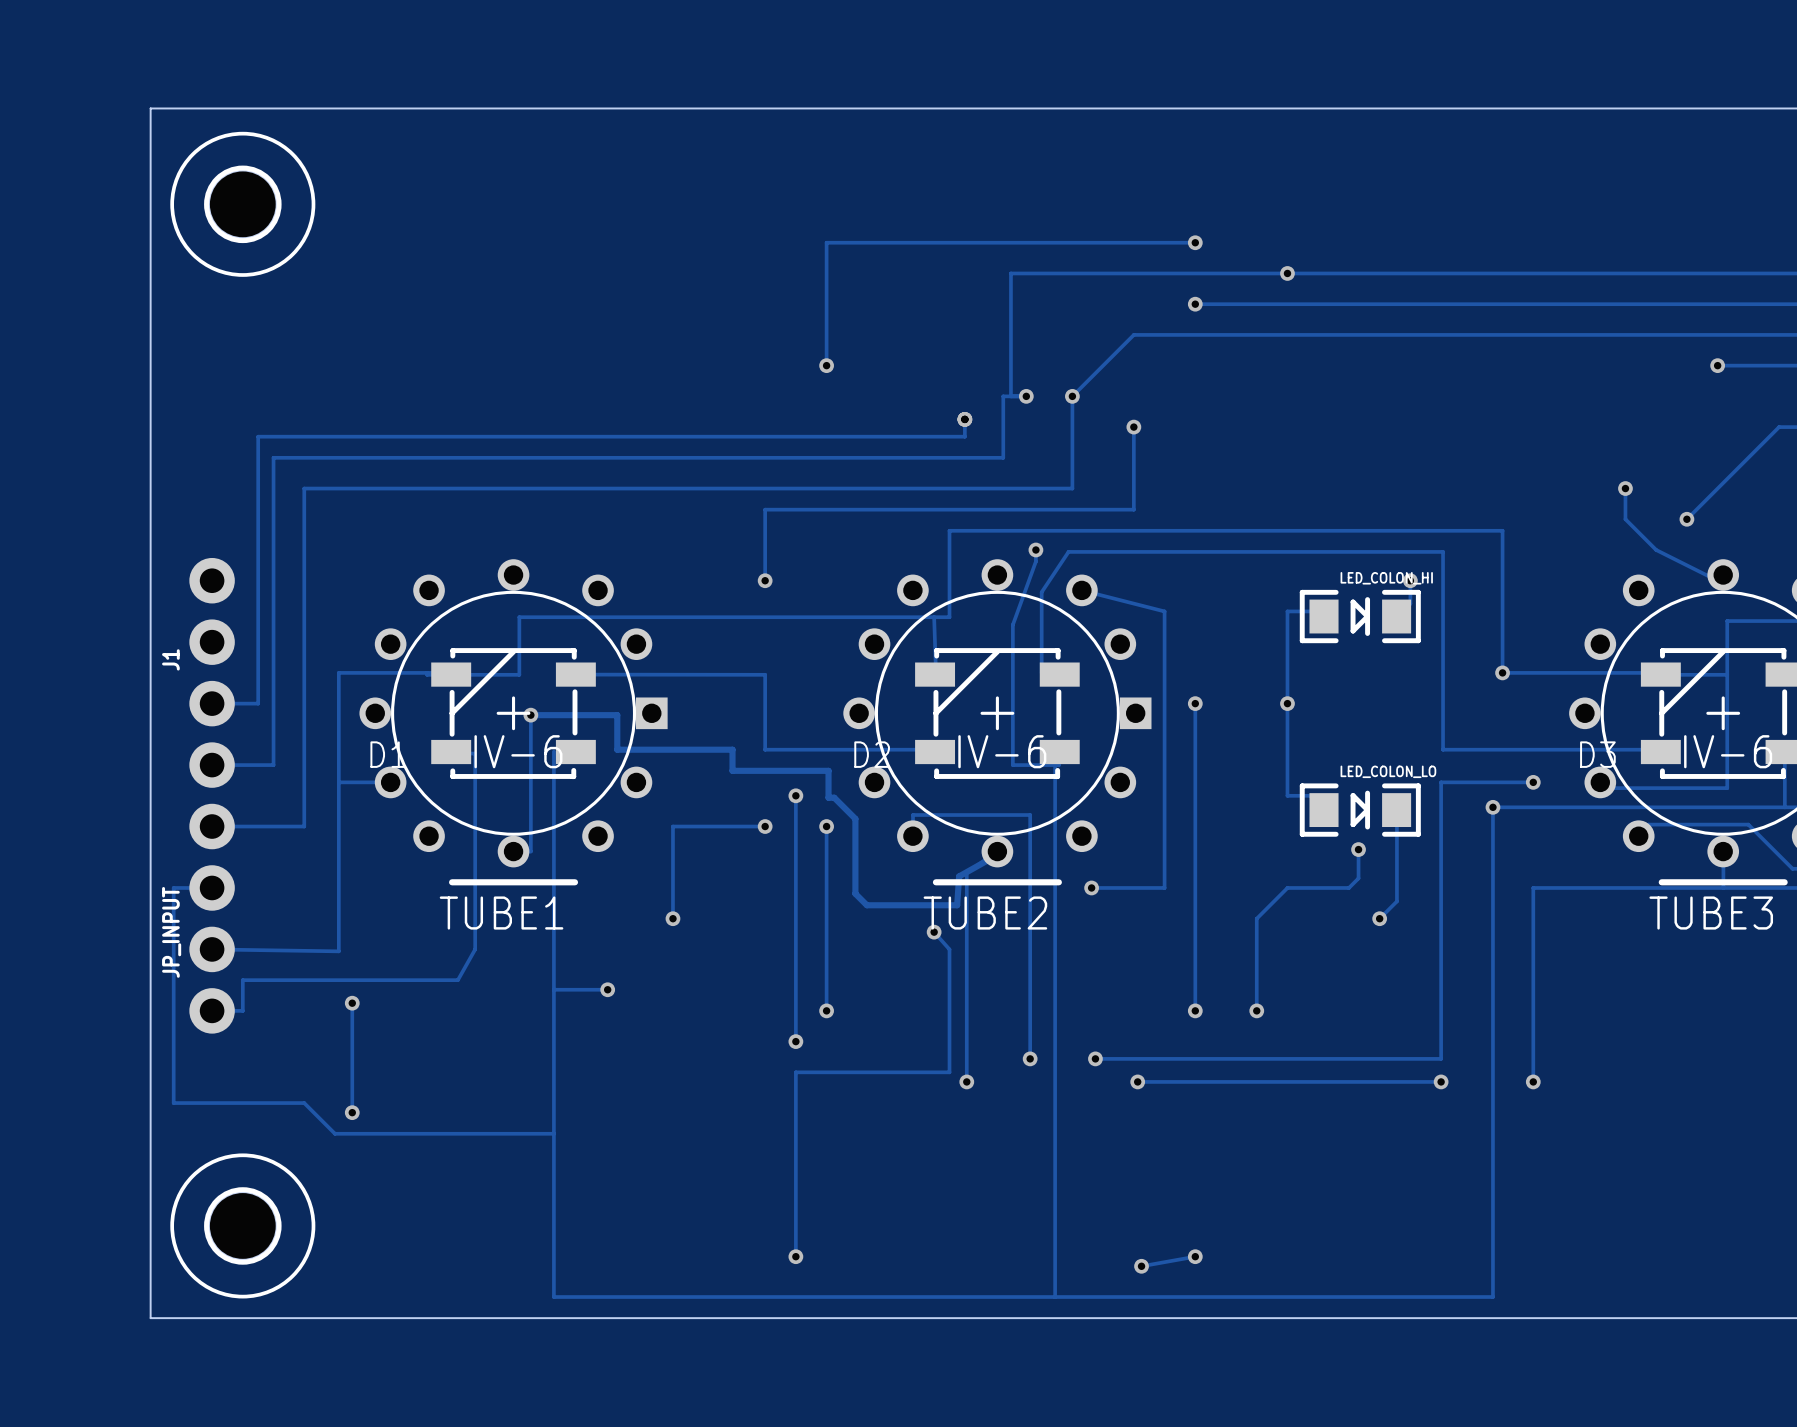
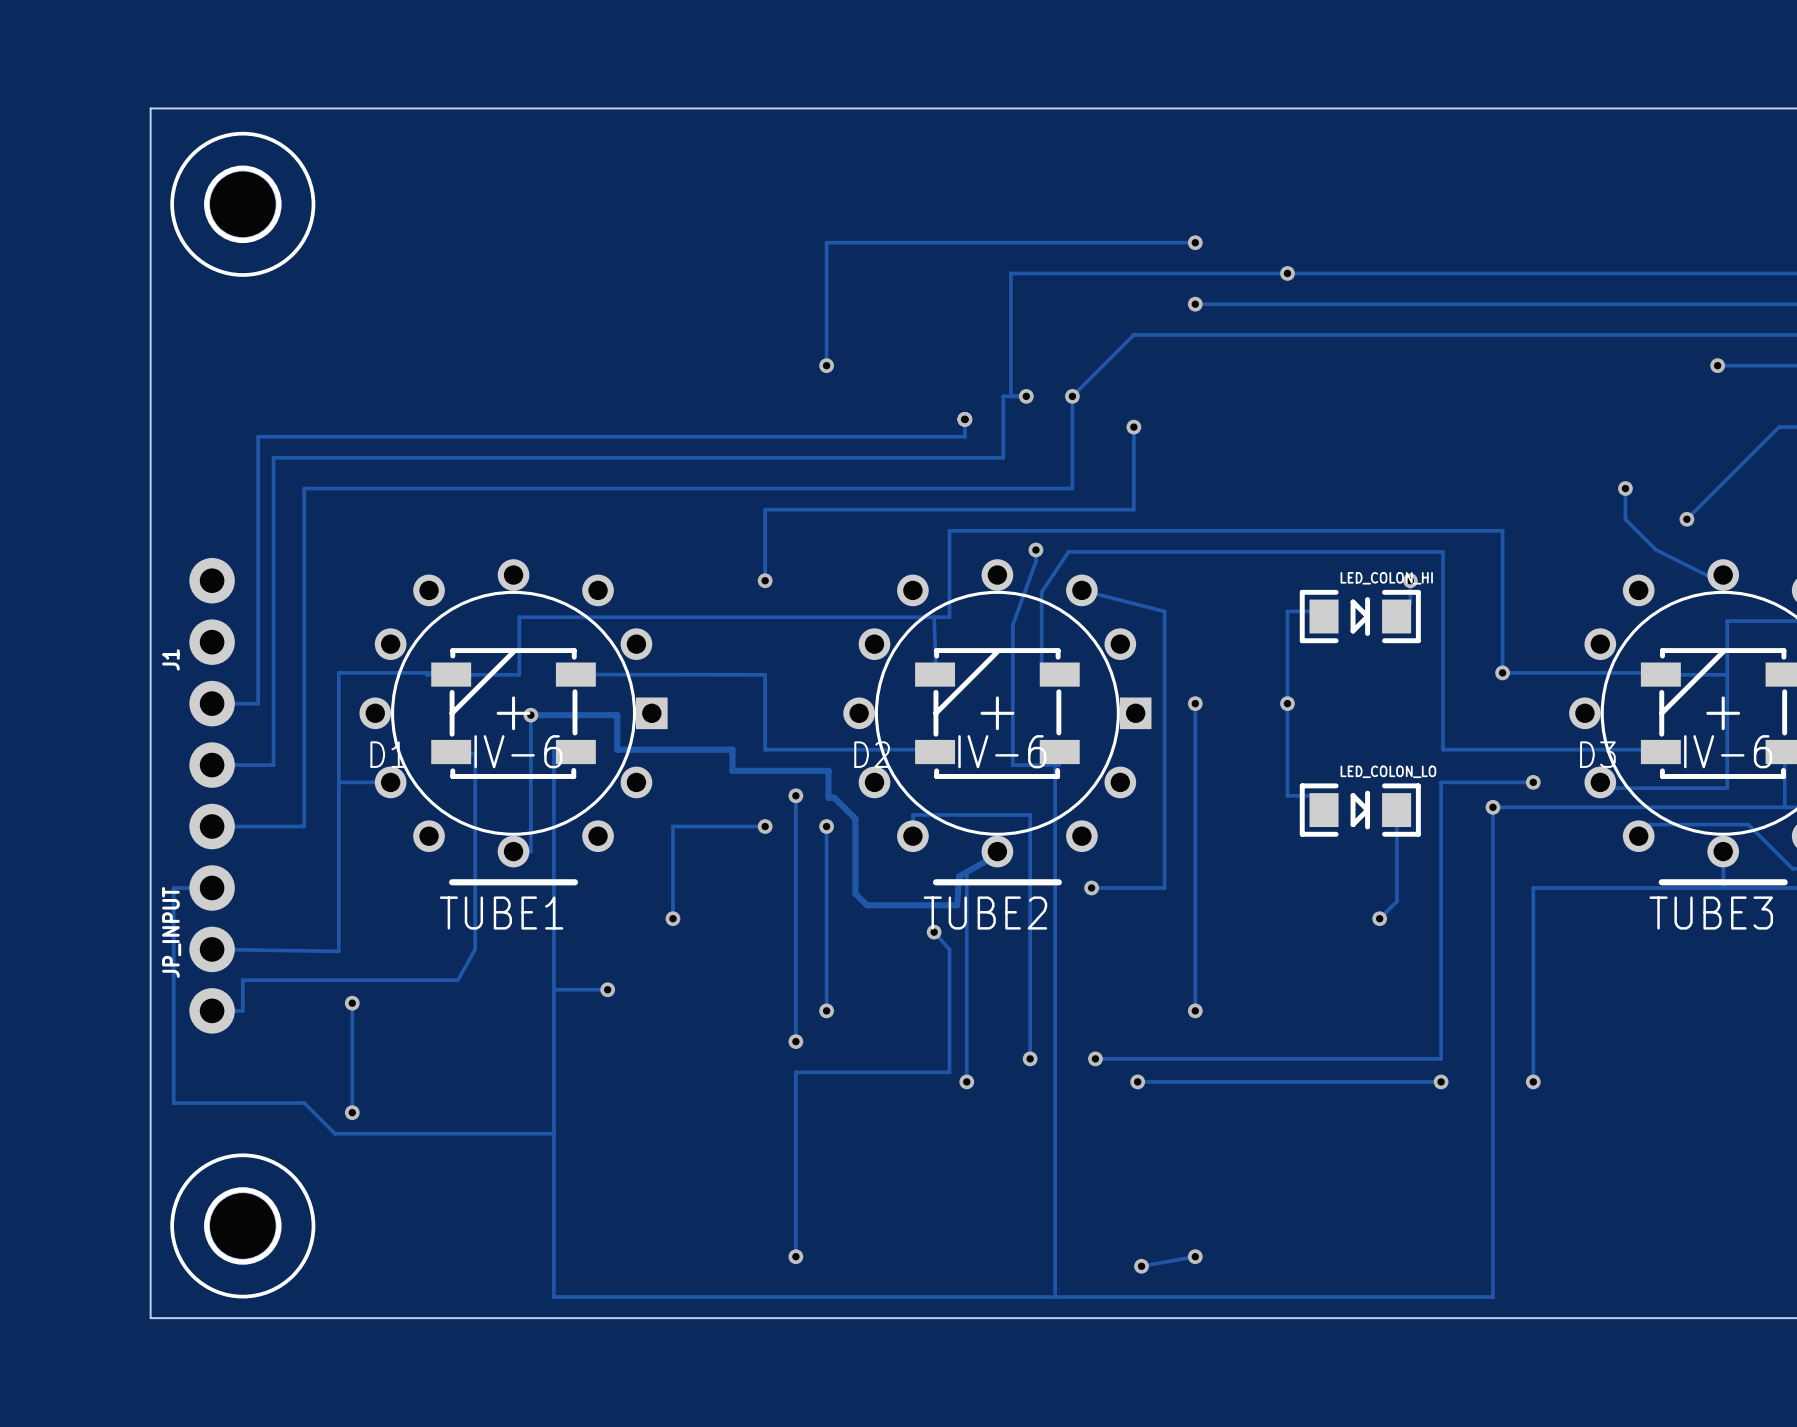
track: (1358, 849) (1358, 878) (1348, 887) (1287, 887) (1256, 918) (1256, 1010) -> none
via: (1358, 849) -> none
via: (1256, 1010) -> none

